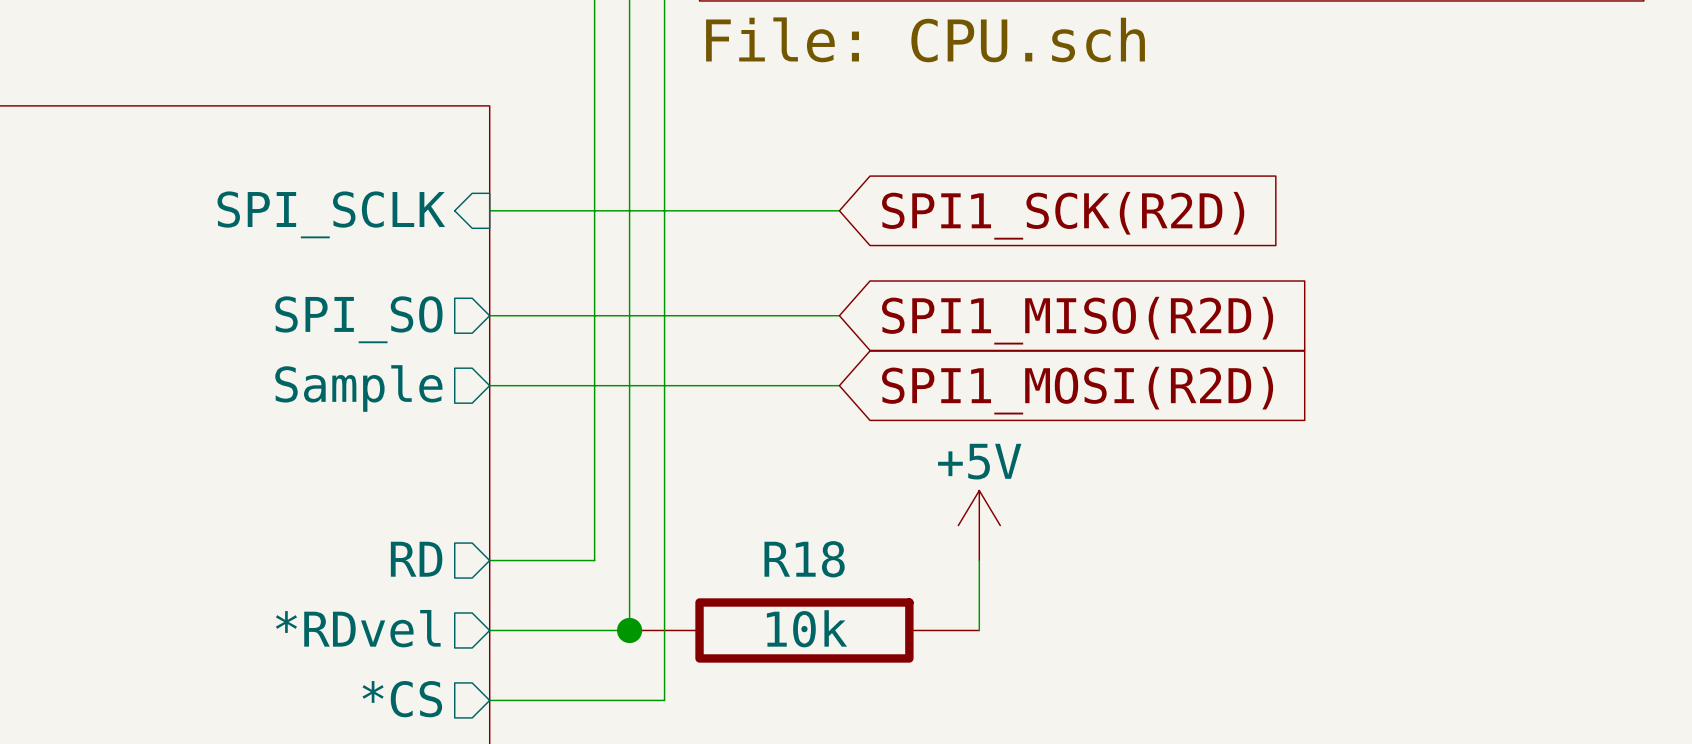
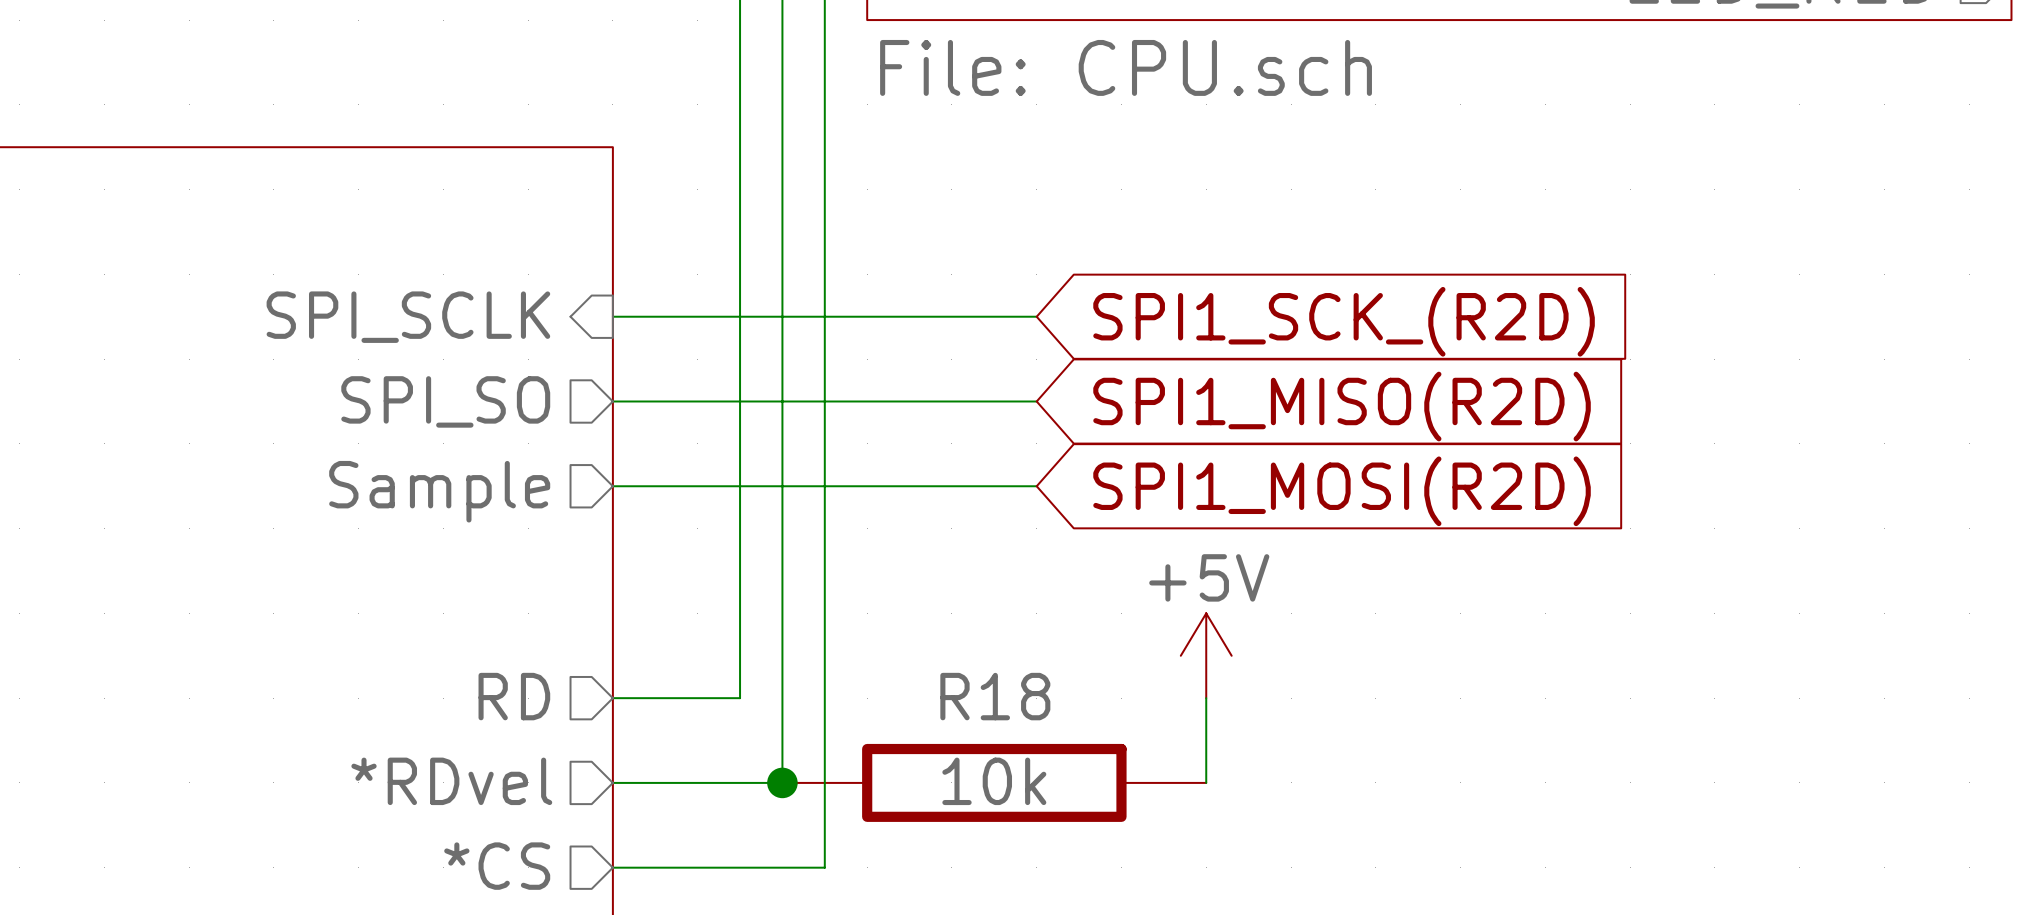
wire: (489, 210) (839, 210) -> (612, 316) (1036, 316)
sheet pin position: SPI_SCLK (331, 214) -> SPI_SCLK (408, 317)
global label: SPI1_SCK(R2D) (1063, 215) -> SPI1_SCK_(R2D) (1344, 321)

